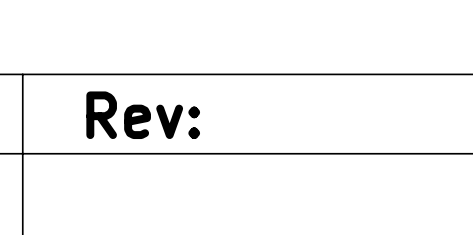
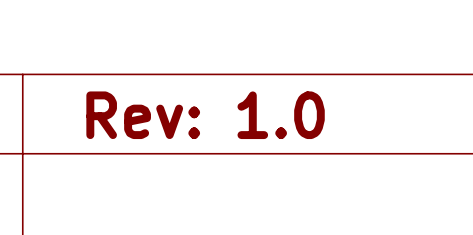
title block: Rev: (143, 115) -> Rev: 1.0 (205, 115)

